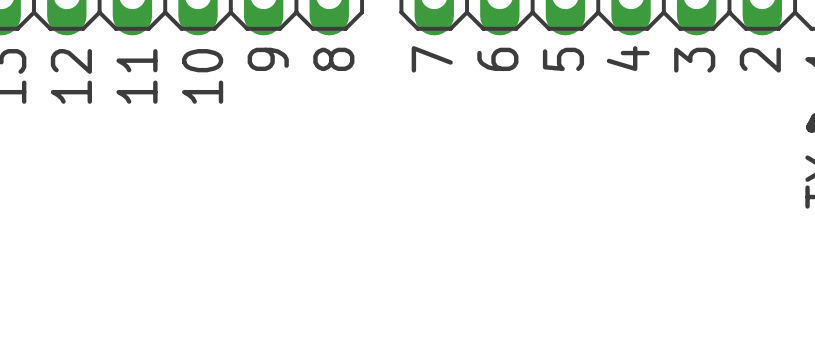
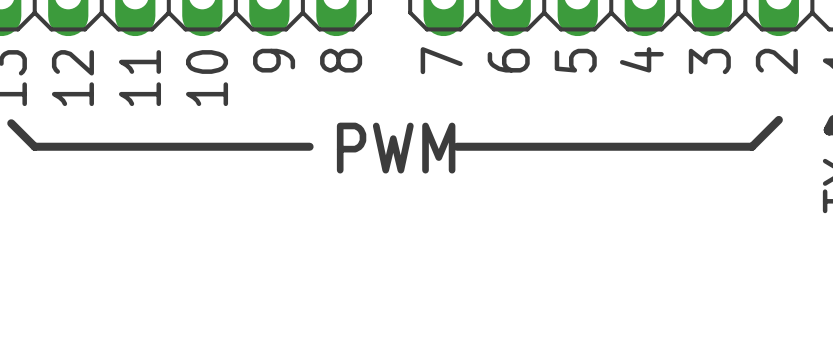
line: none -> (778, 119) (752, 146) (457, 146)
line: none -> (11, 123) (34, 146) (309, 146)
text: none -> PWM (396, 148)

